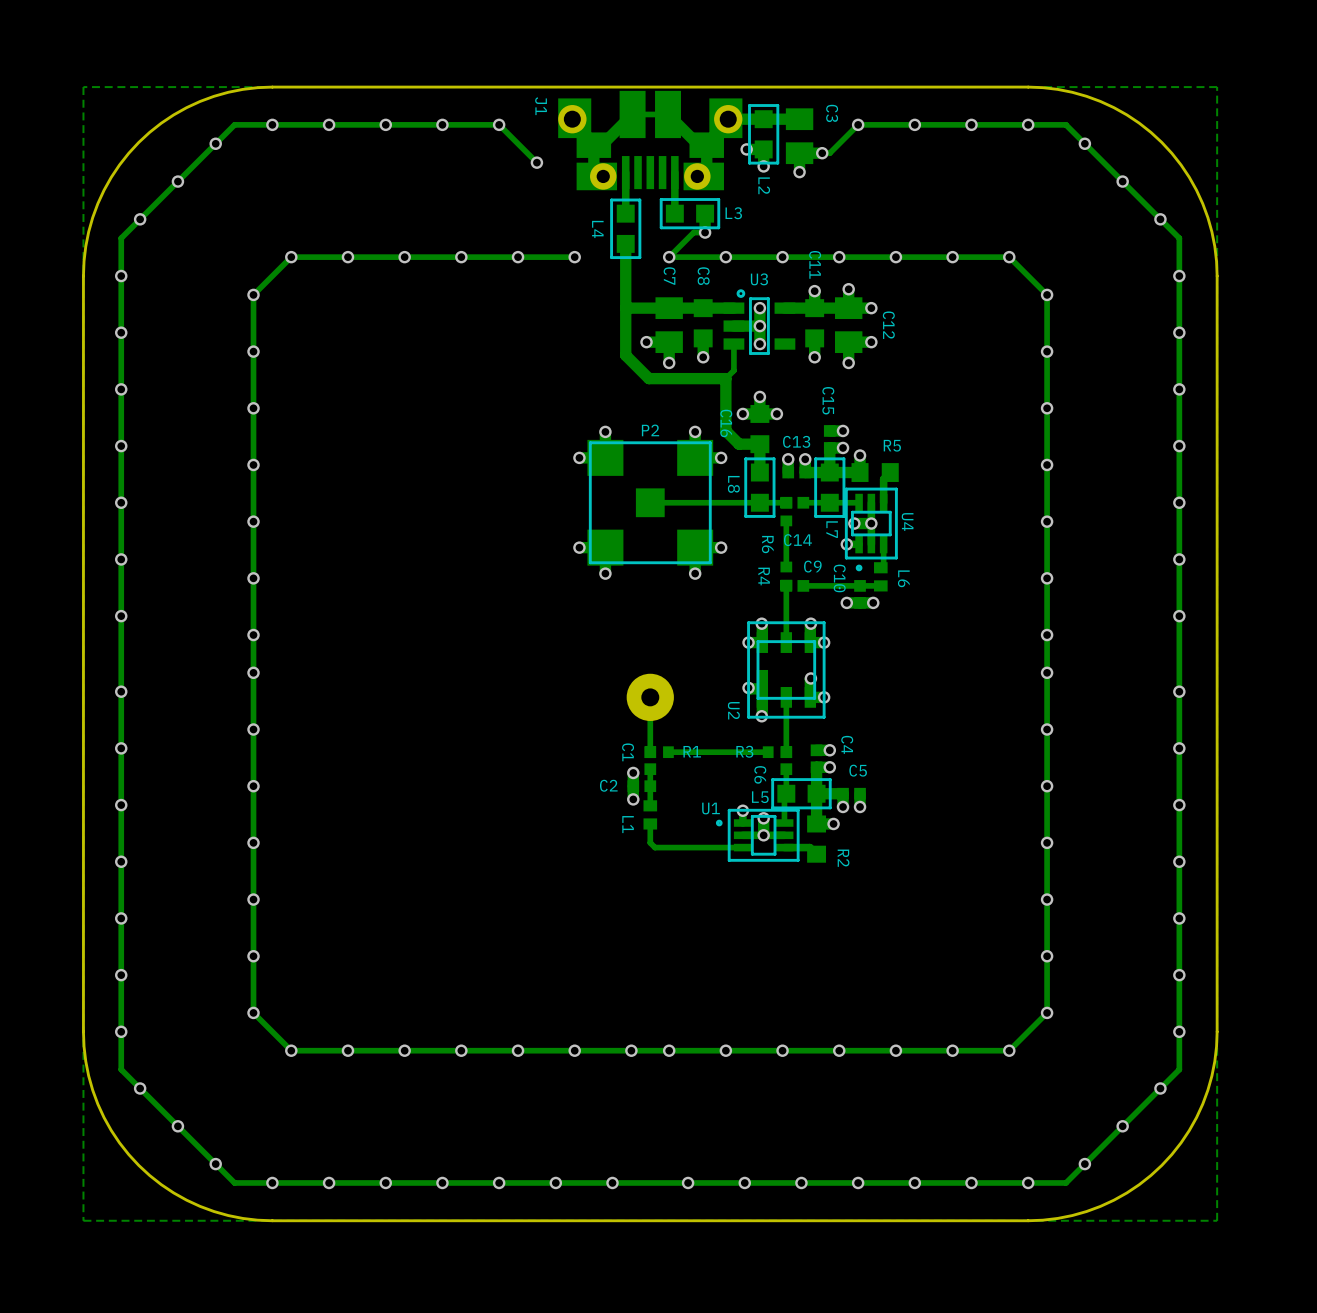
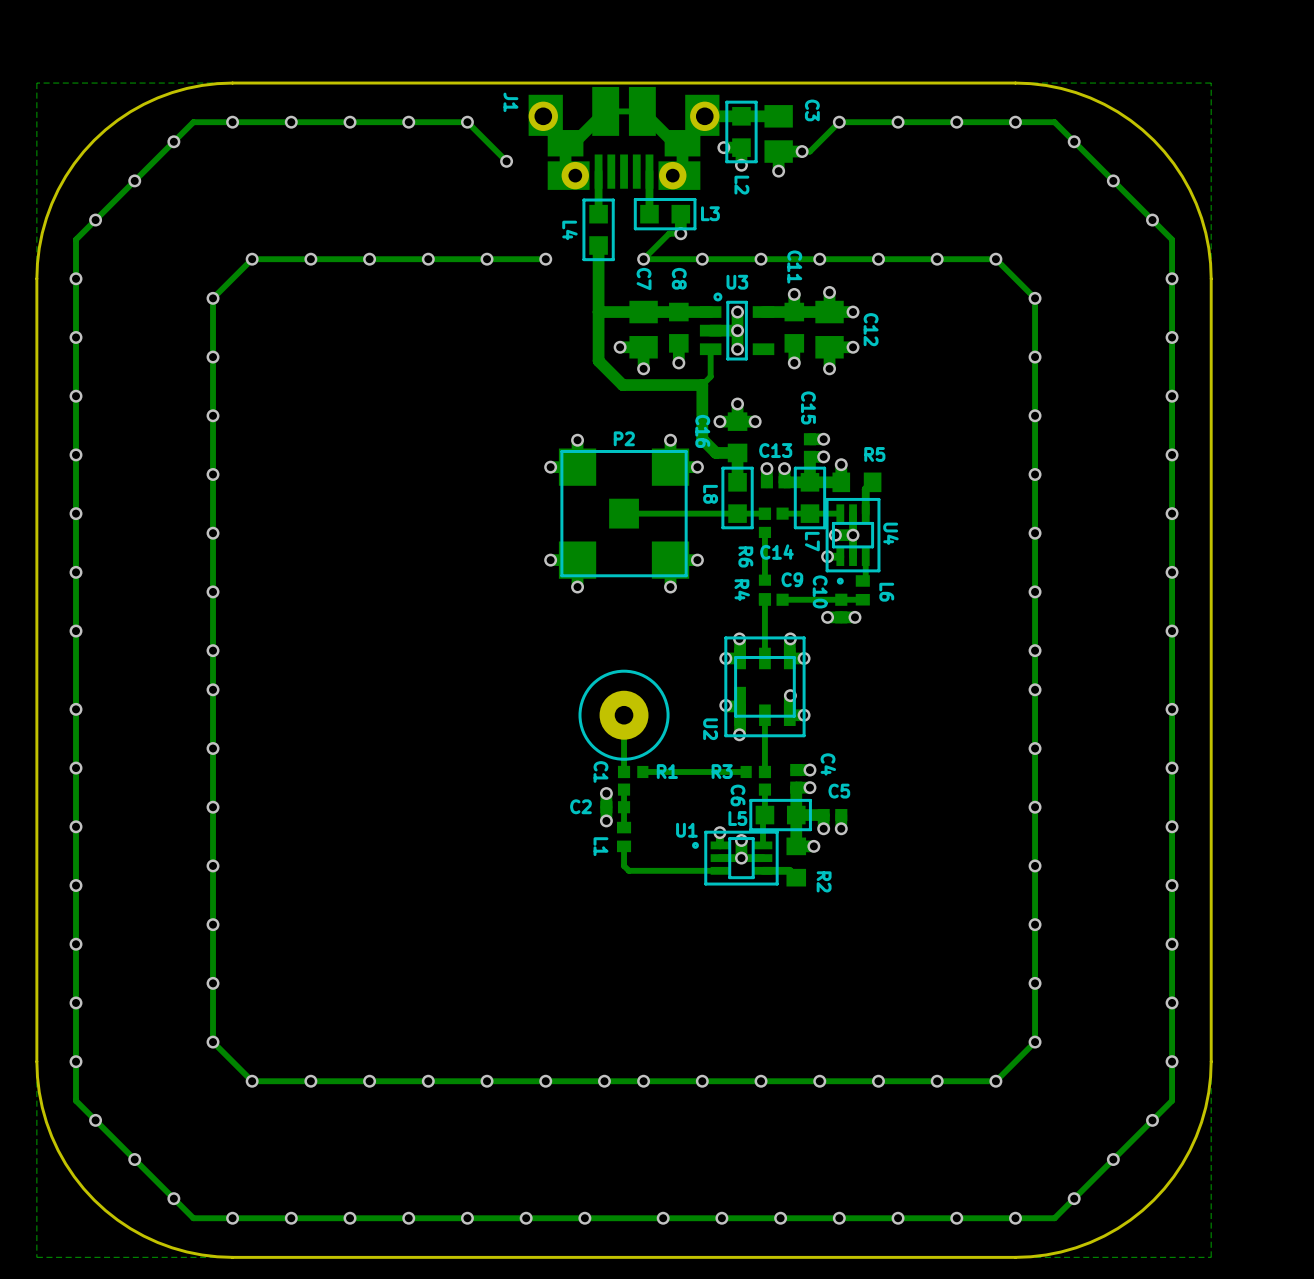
part footprint: [626, 673, 674, 721] -> [578, 669, 670, 761]

